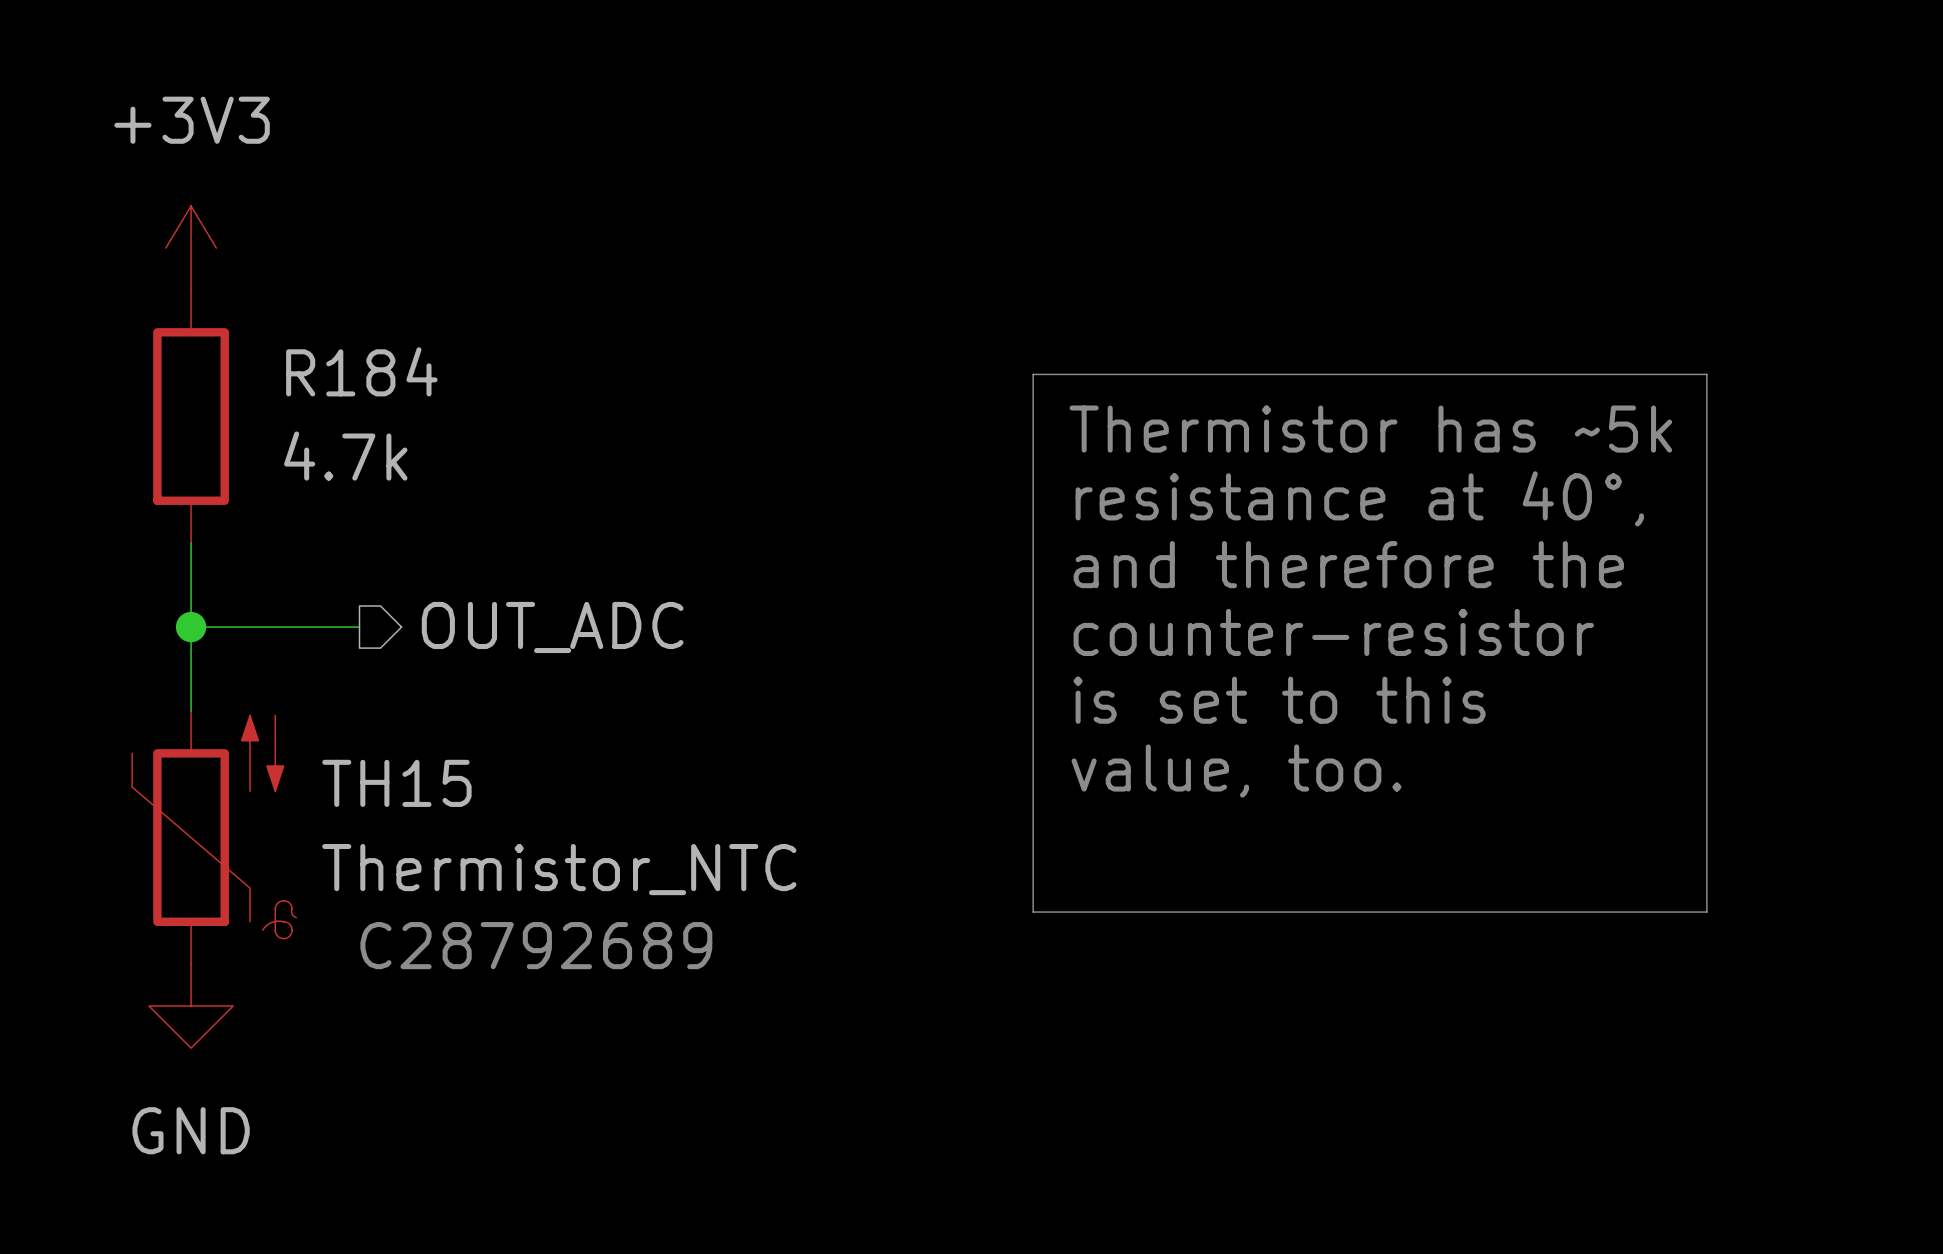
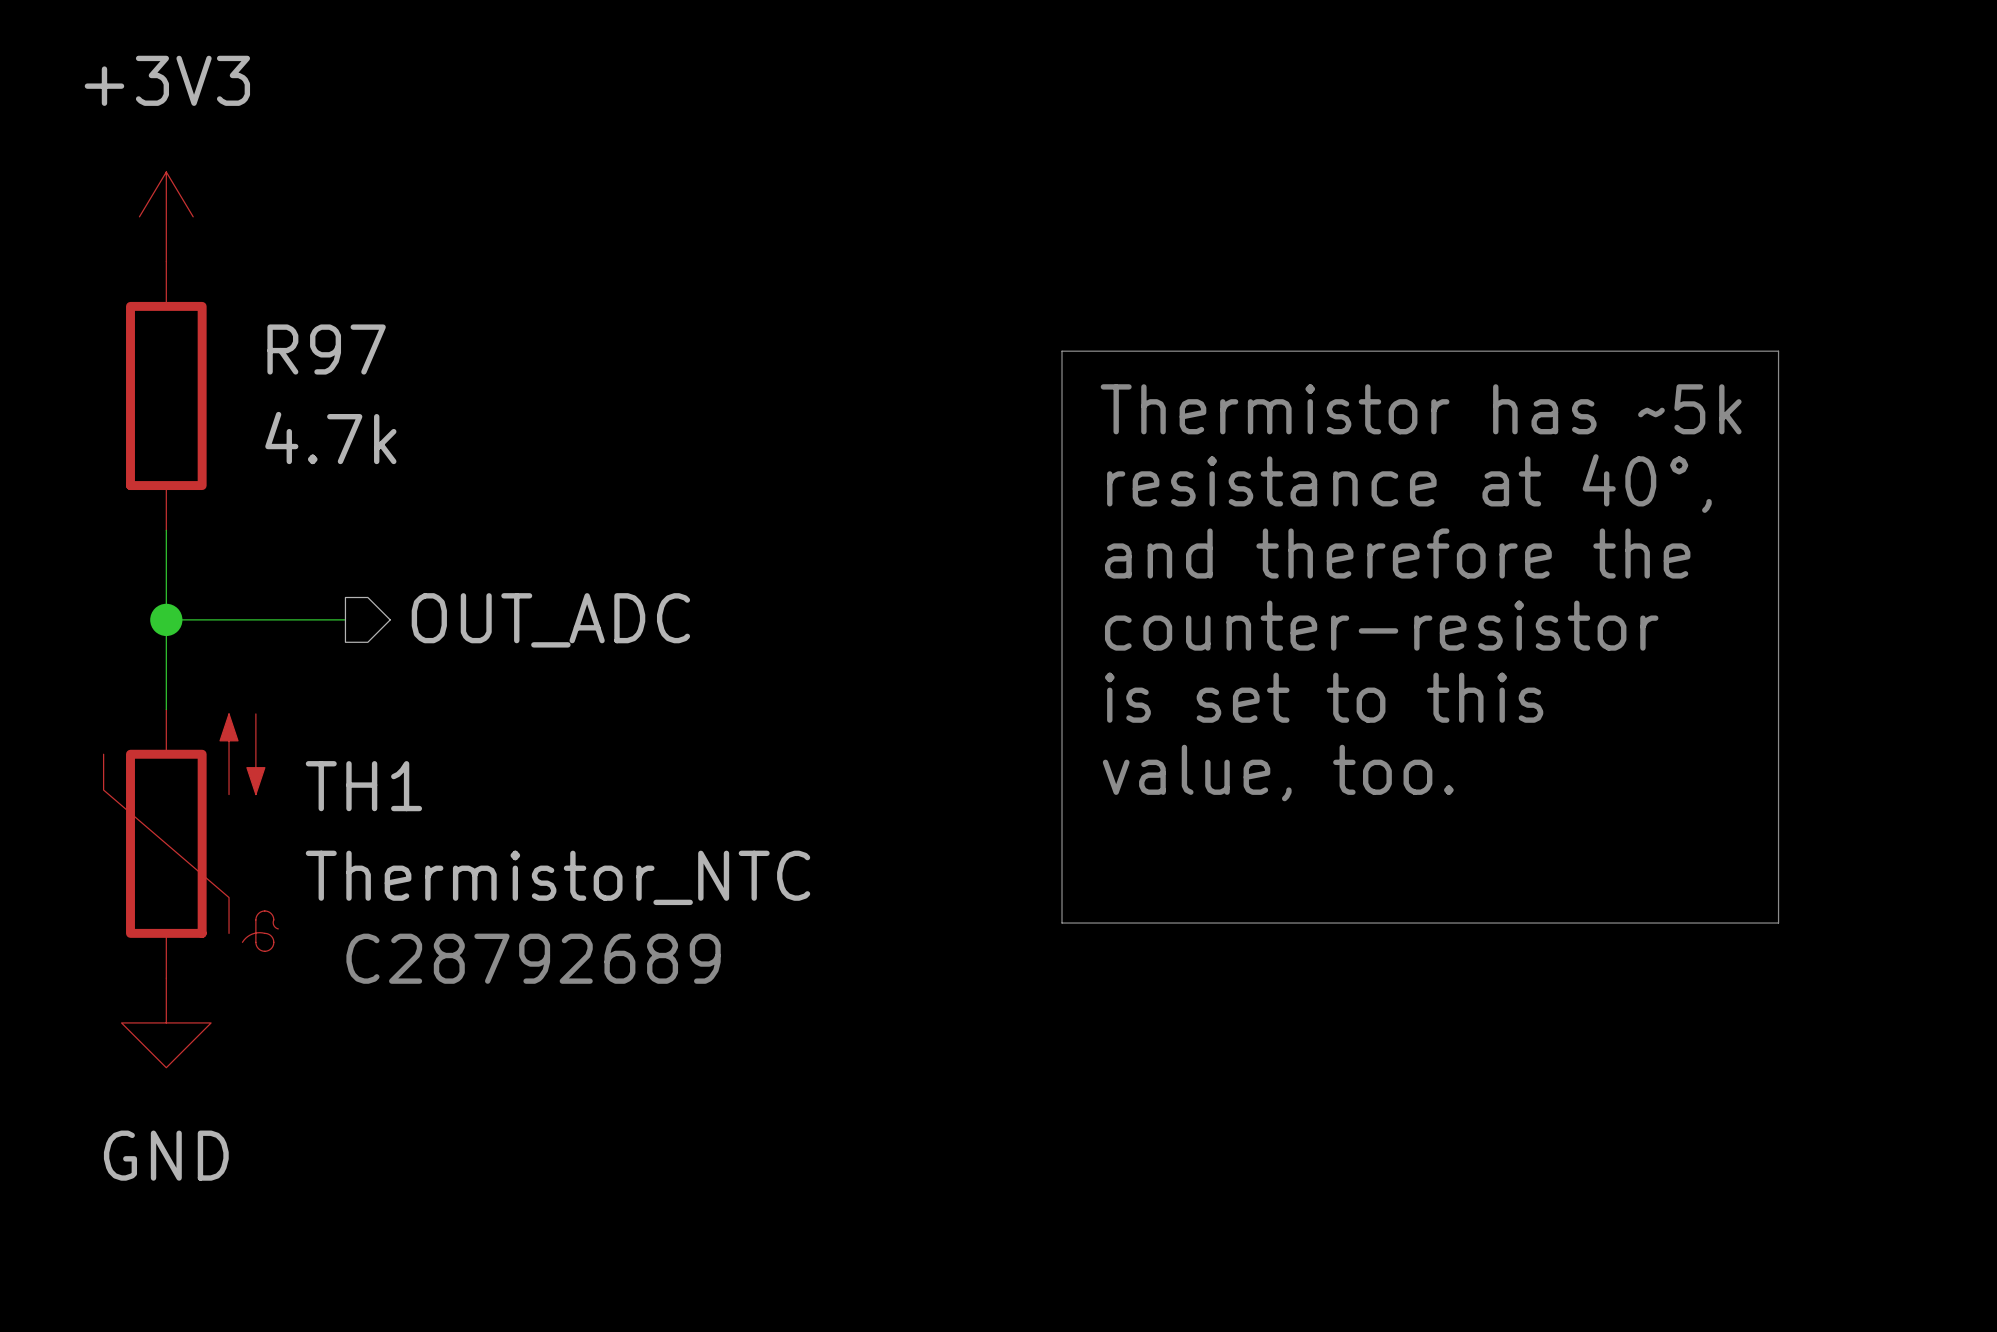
R184 name: R184 (361, 371) -> R97 (326, 349)
TH15 name: TH15 (396, 783) -> TH1 (363, 786)

